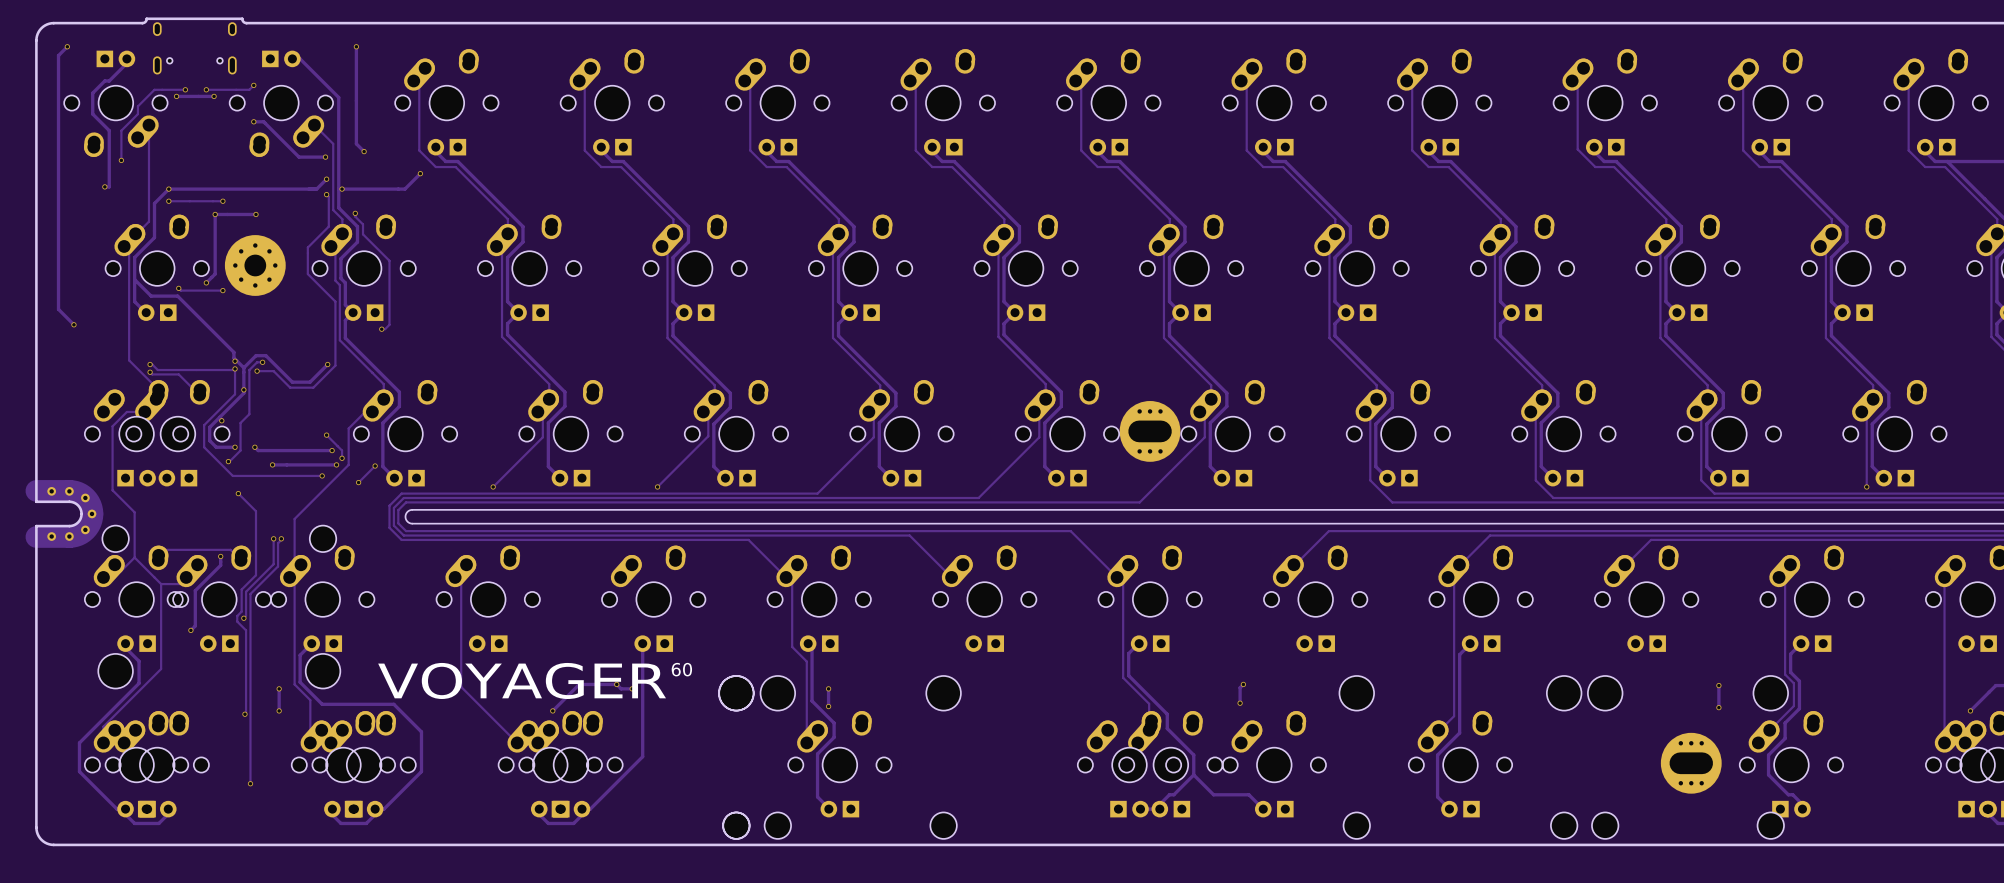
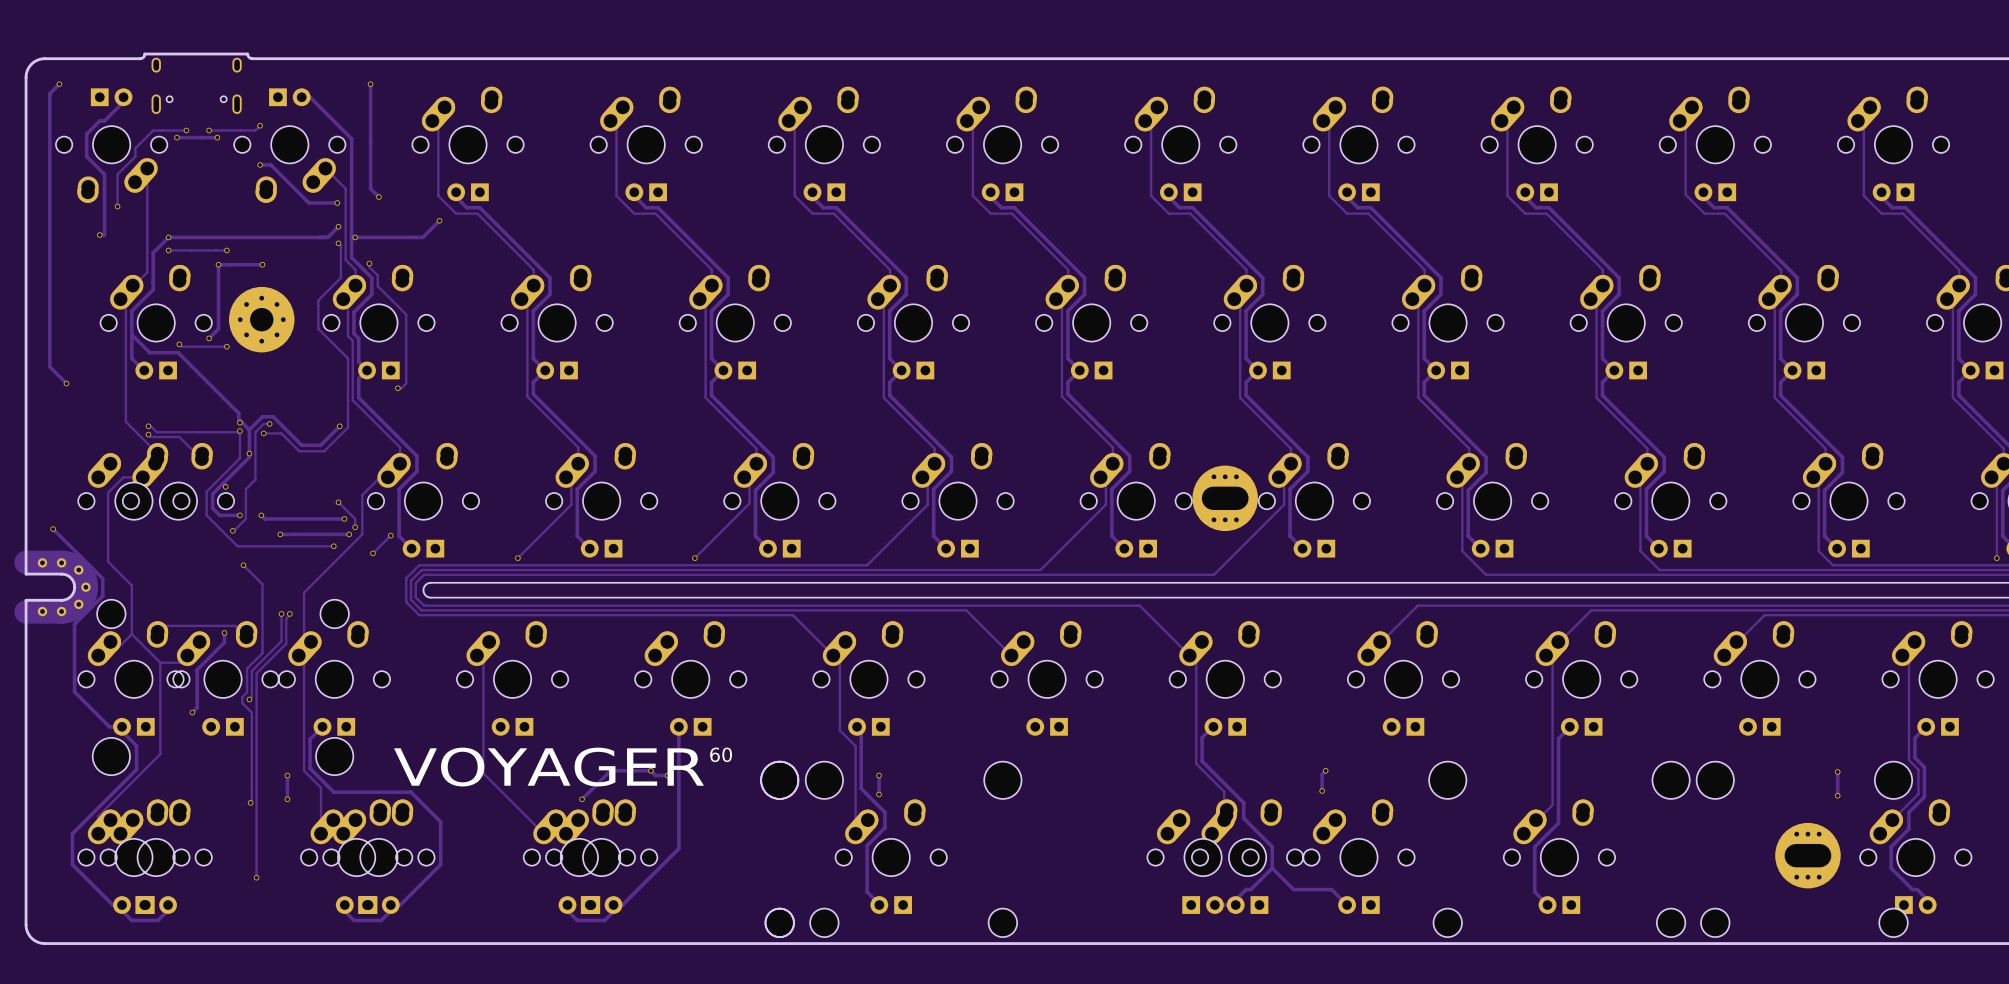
part: (136, 433) -> none
part: (177, 433) -> none
track: none -> (53, 529) (102, 578) (102, 596) (74, 624) (74, 691) (109, 726) (122, 726)
via: none -> (53, 529)

